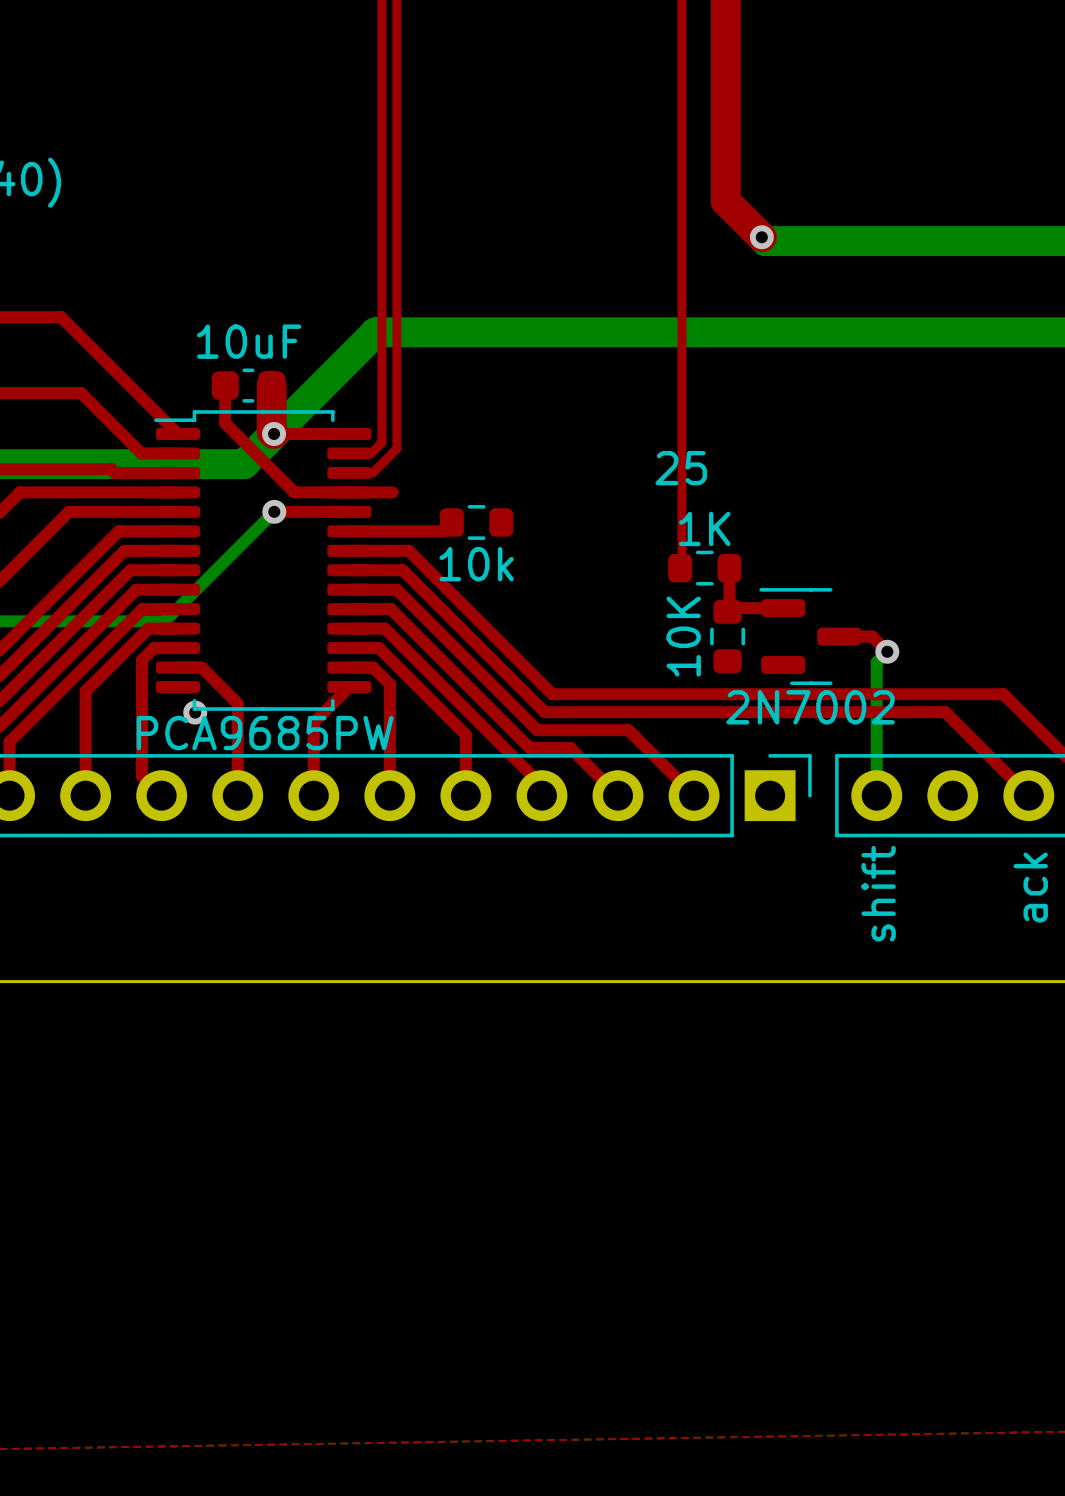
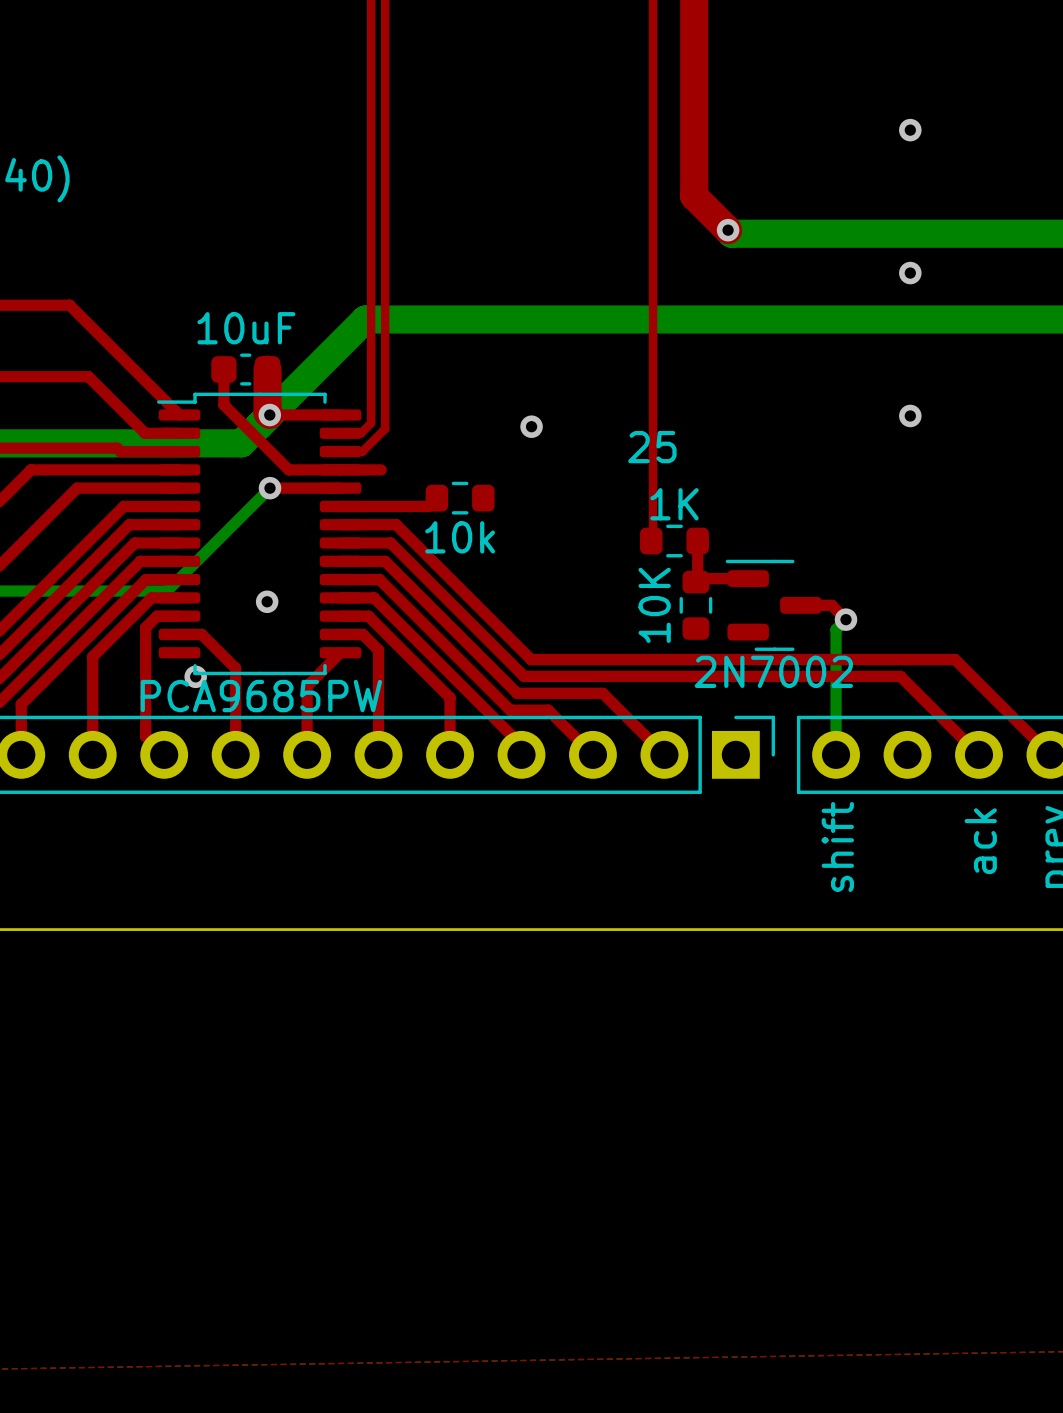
via: none -> (910, 130)
via: none -> (910, 273)
via: none -> (910, 415)
via: none -> (531, 426)
via: none -> (267, 601)

